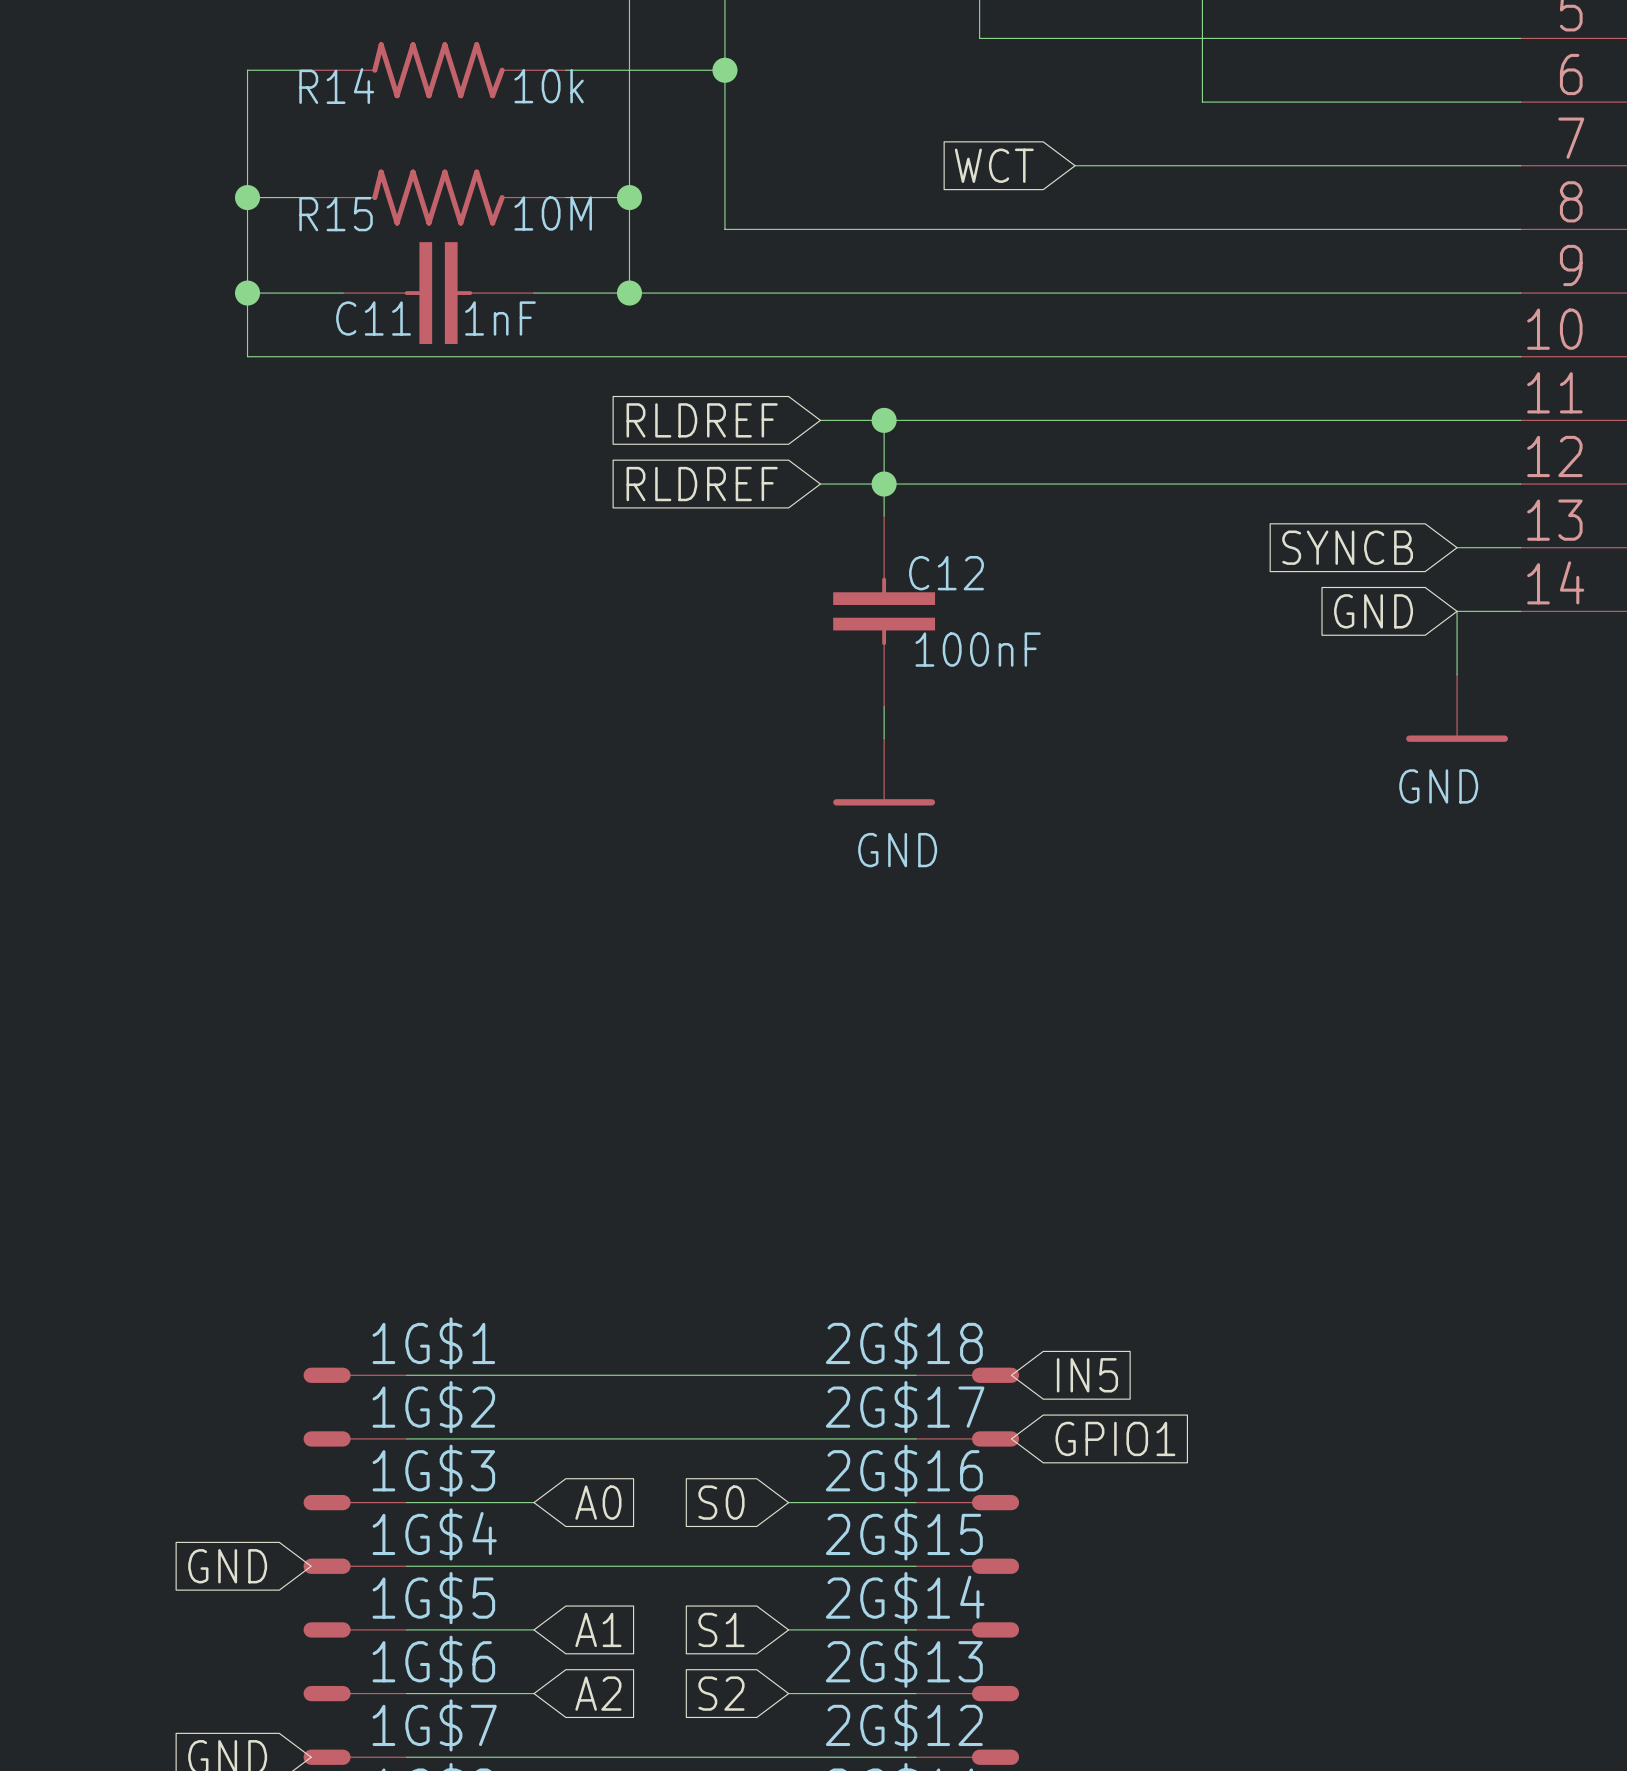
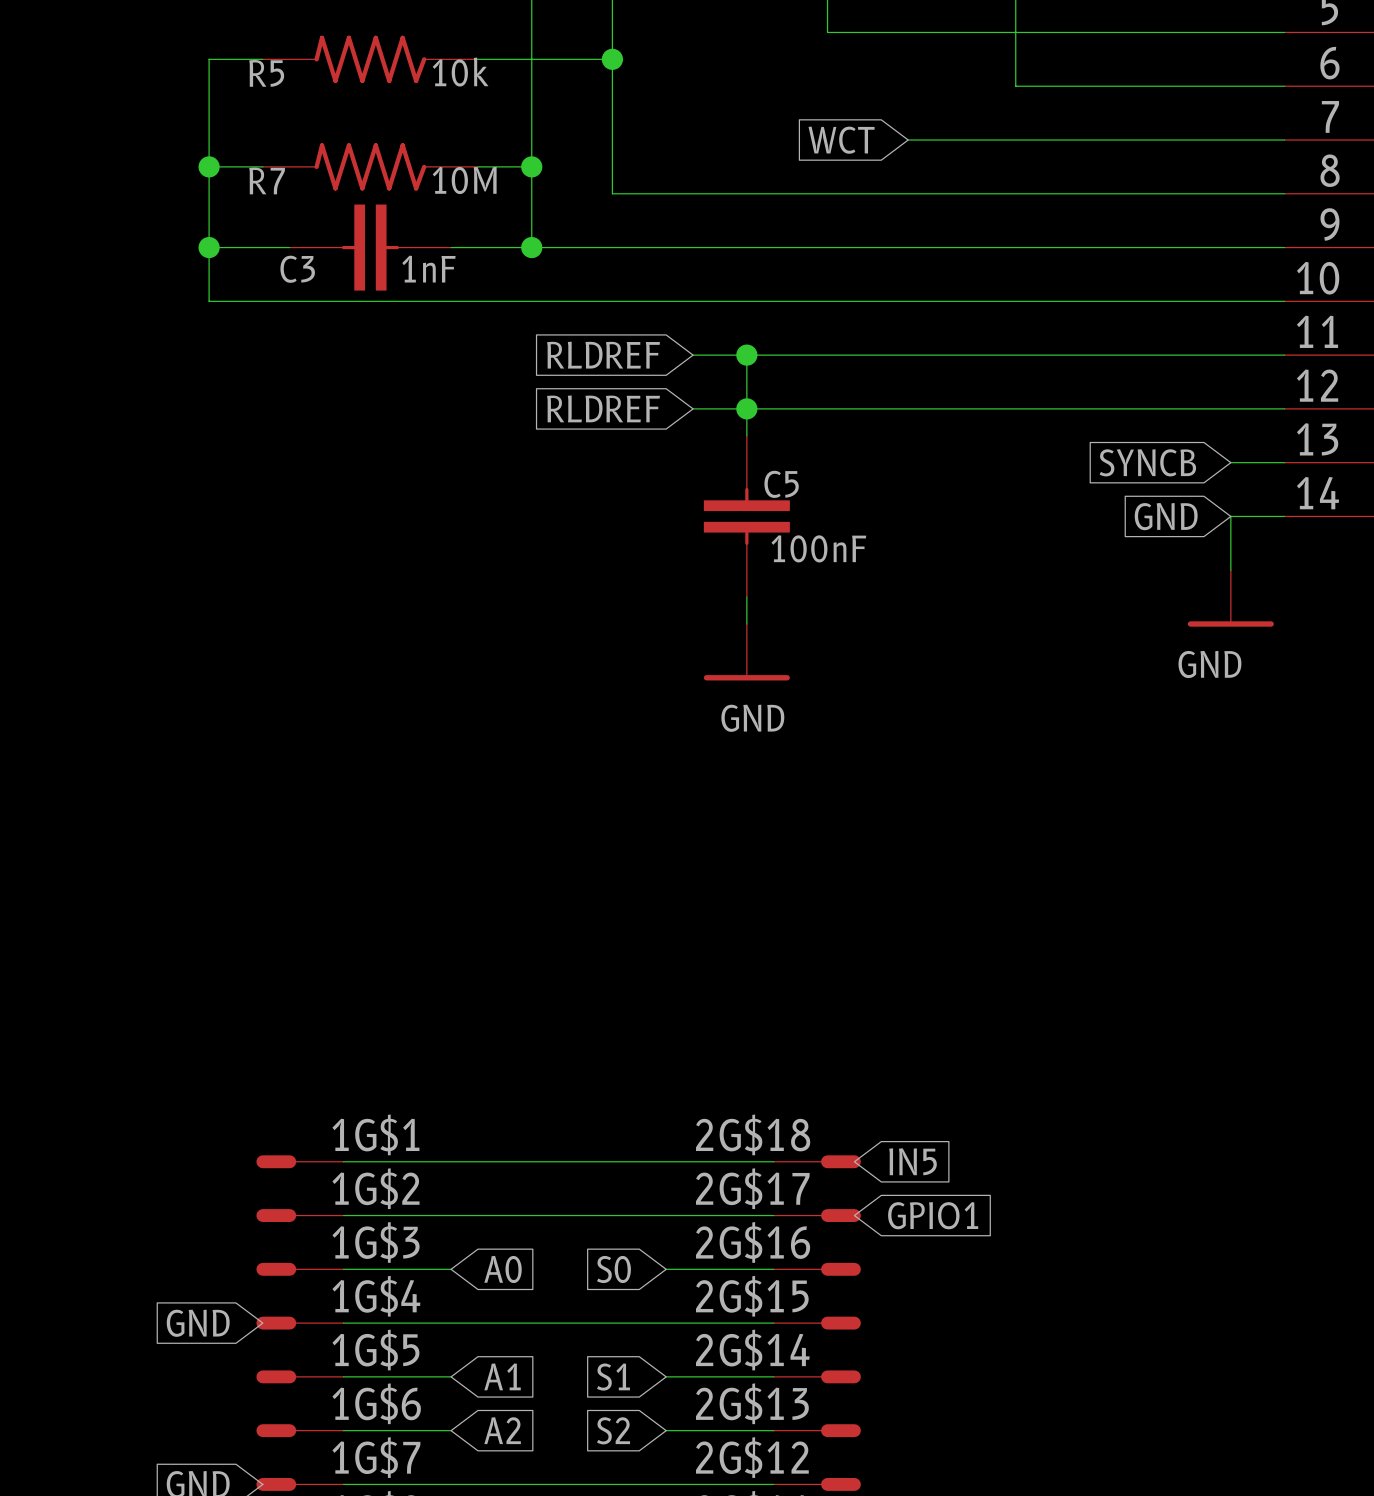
R14 name: R14 (336, 86) -> R5 (266, 73)
R15 name: R15 (336, 214) -> R7 (267, 180)
C11 name: C11 (373, 318) -> C3 (297, 269)
C12 name: C12 (946, 573) -> C5 (781, 484)

